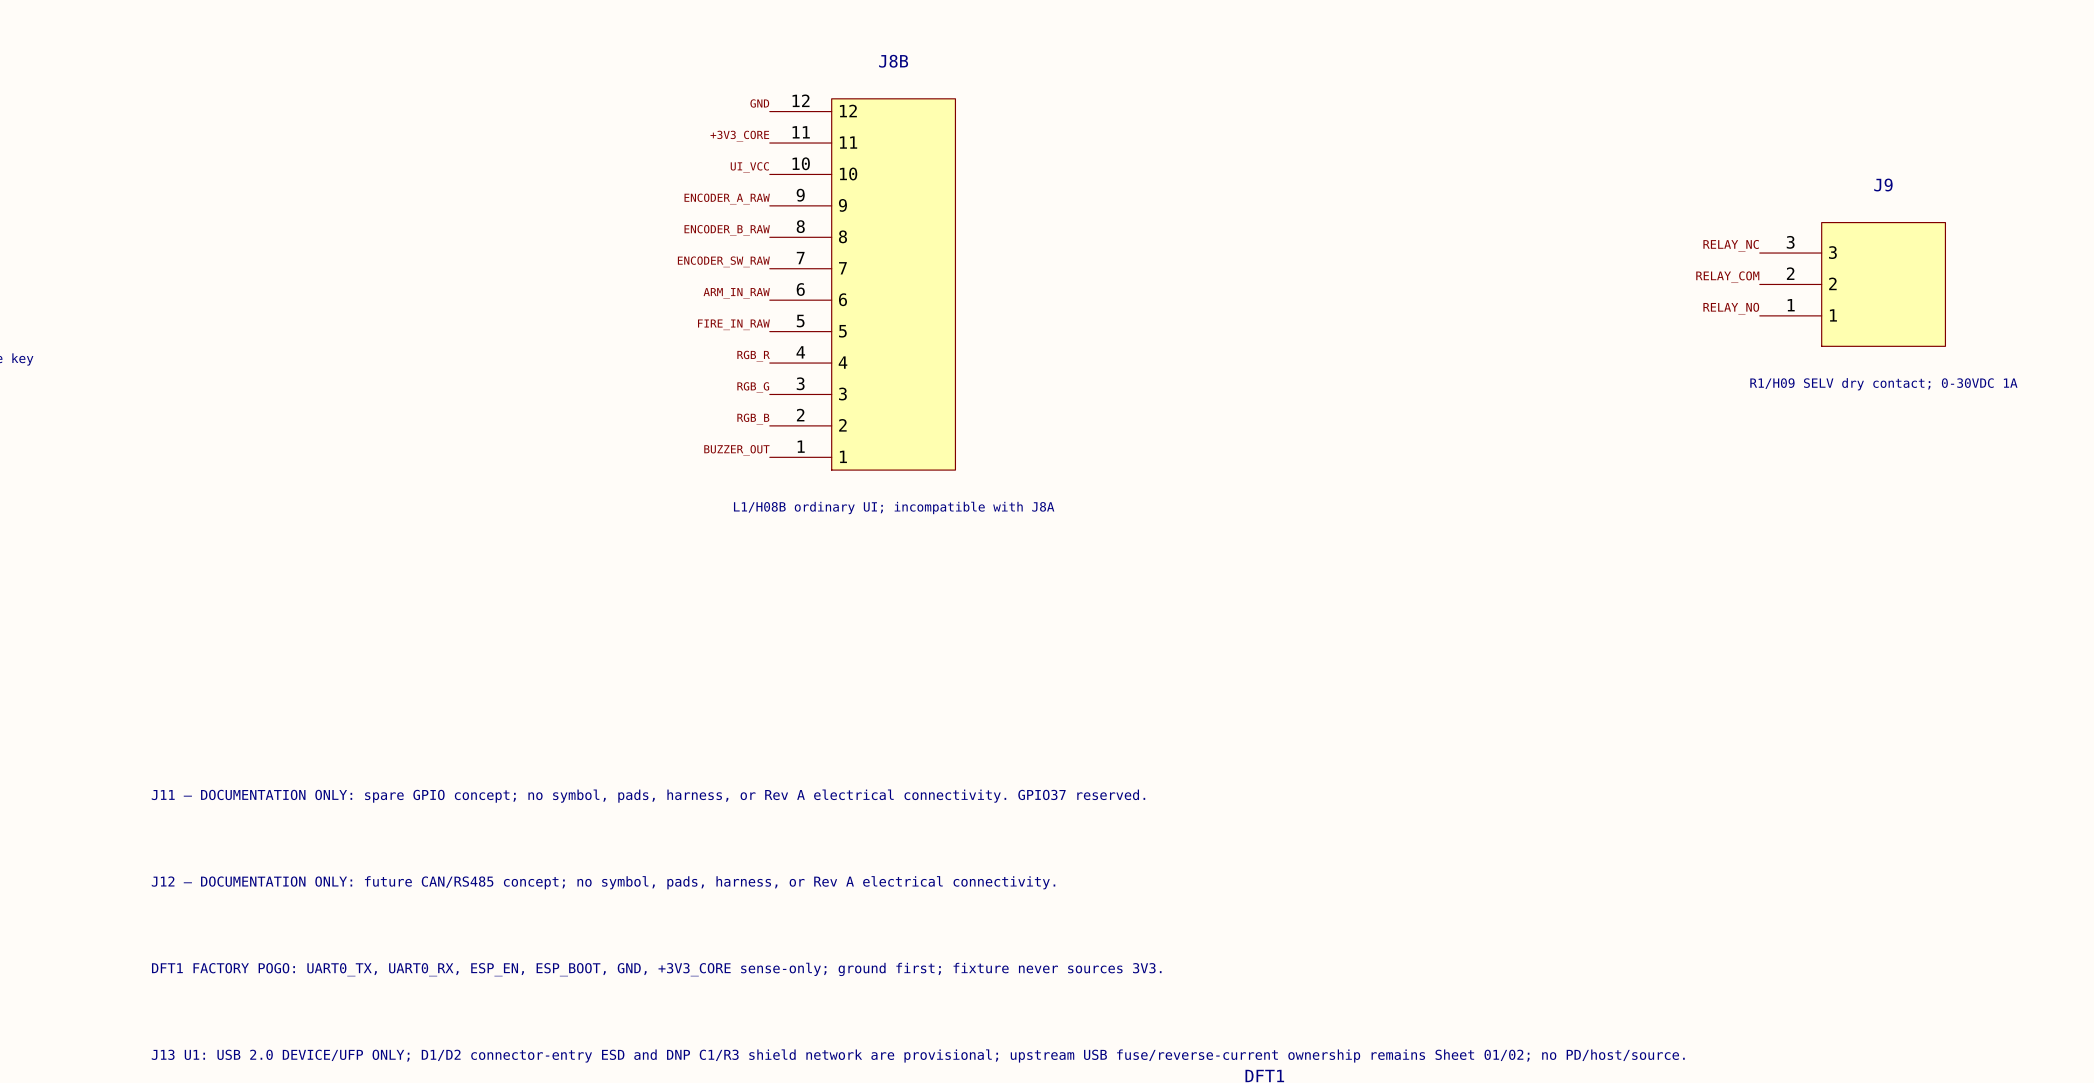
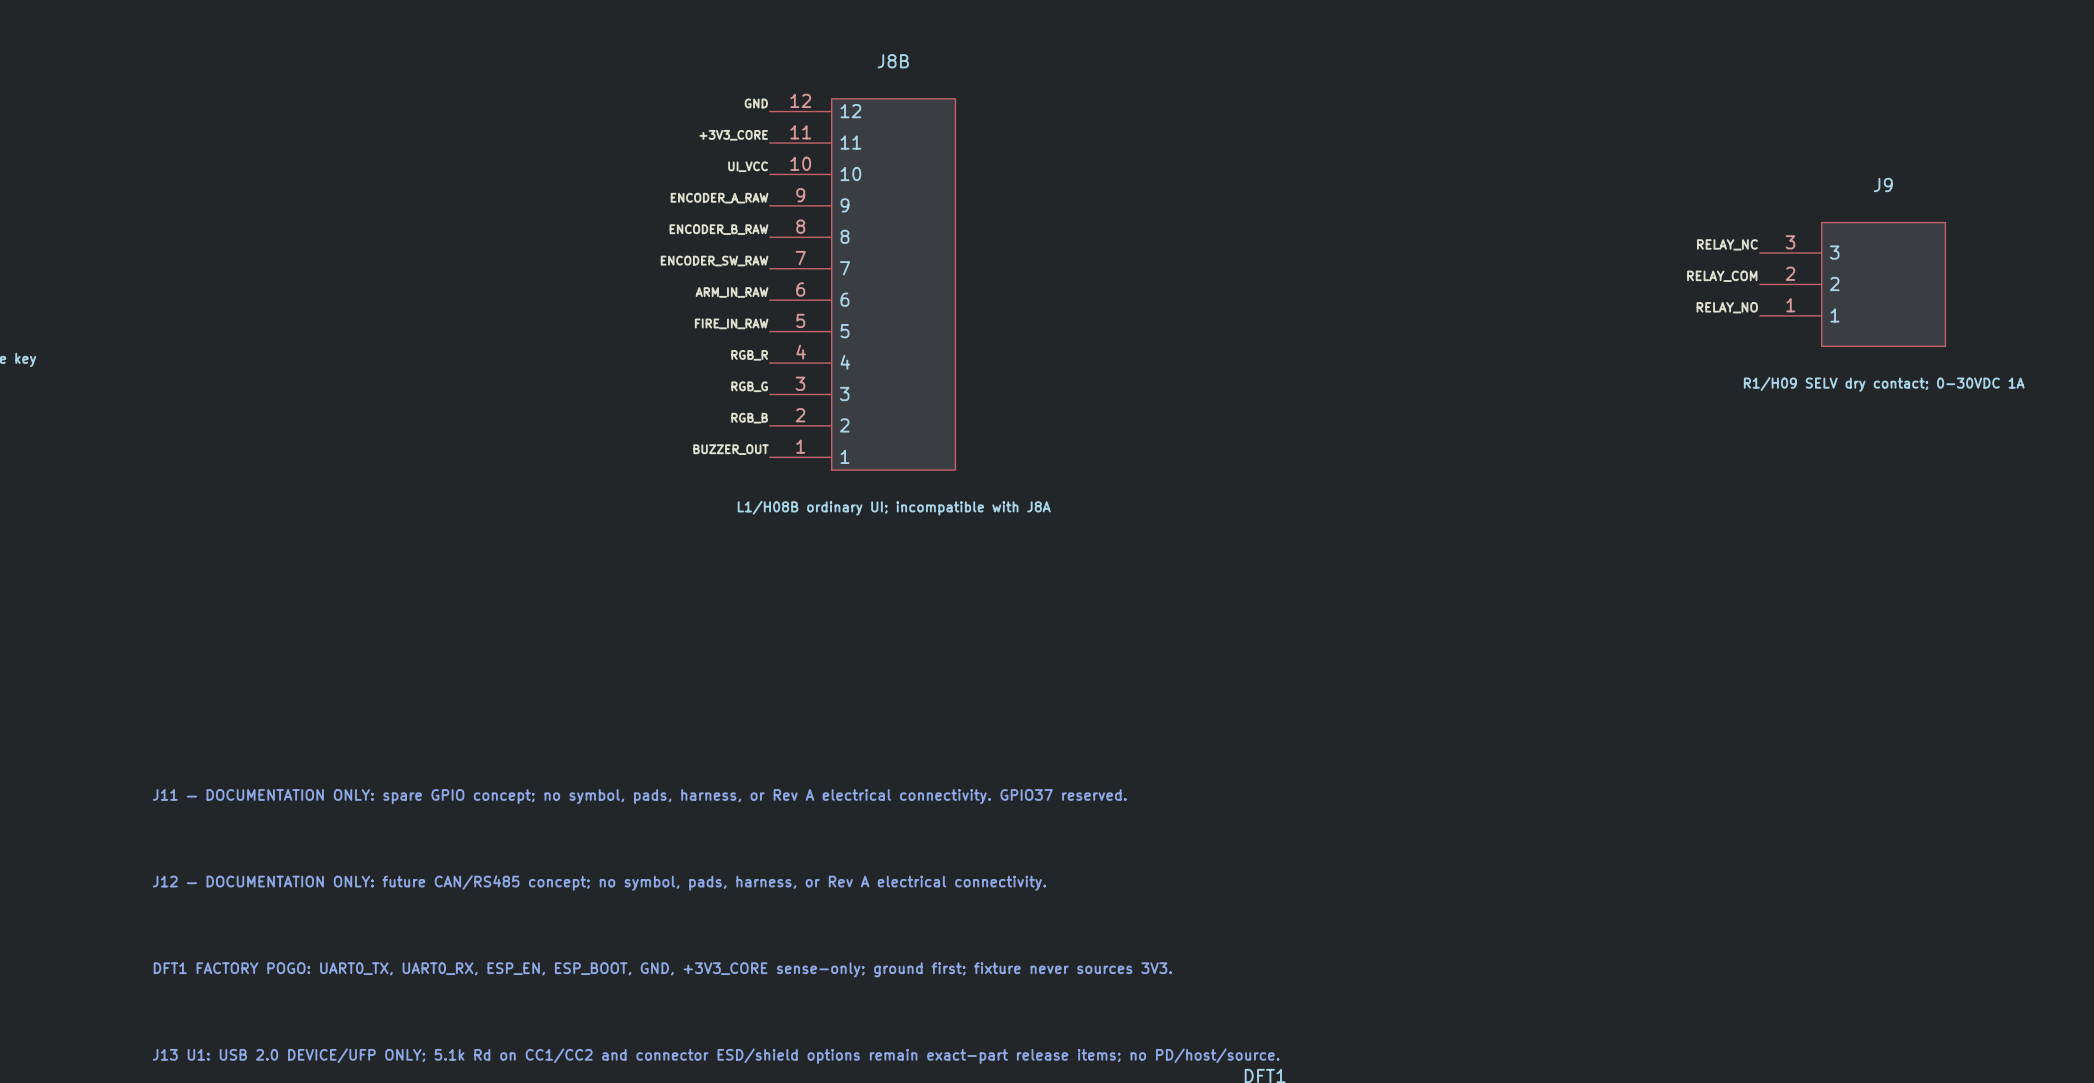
text: J13 U1: USB 2.0 DEVICE/UFP ONLY; D1/D2 connector-entry ESD and DNP C1/R3 shield network are provisional; upstream USB fuse/reverse-current ownership remains Sheet 01/02; no PD/host/source. (918, 1055) -> J13 U1: USB 2.0 DEVICE/UFP ONLY; 5.1k Rd on CC1/CC2 and connector ESD/shield options remain exact-part release items; no PD/host/source. (716, 1056)

